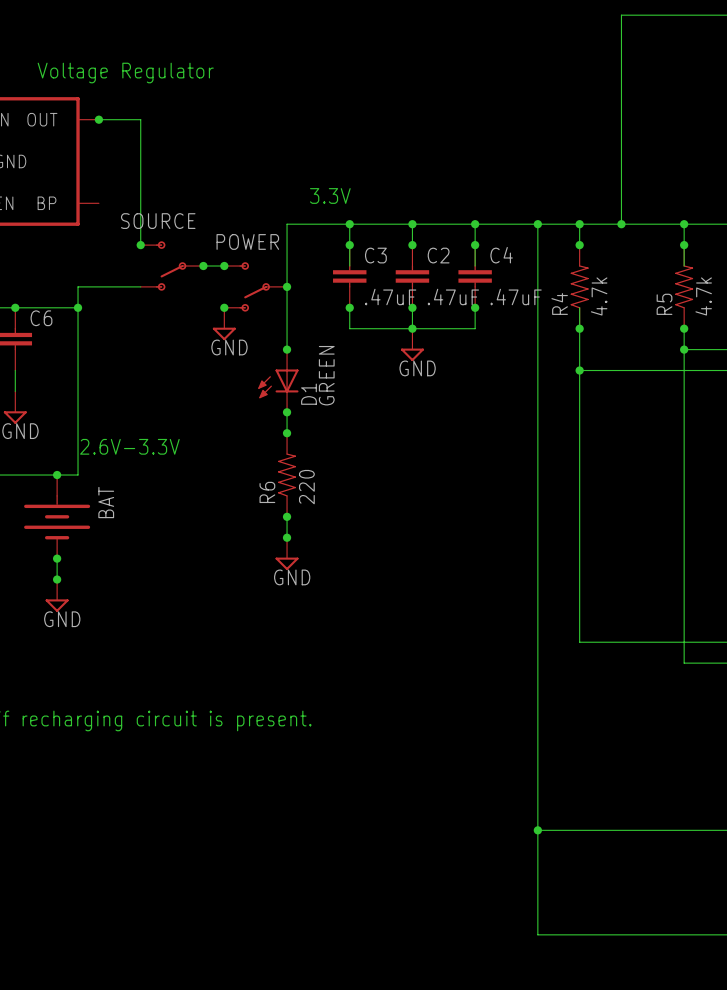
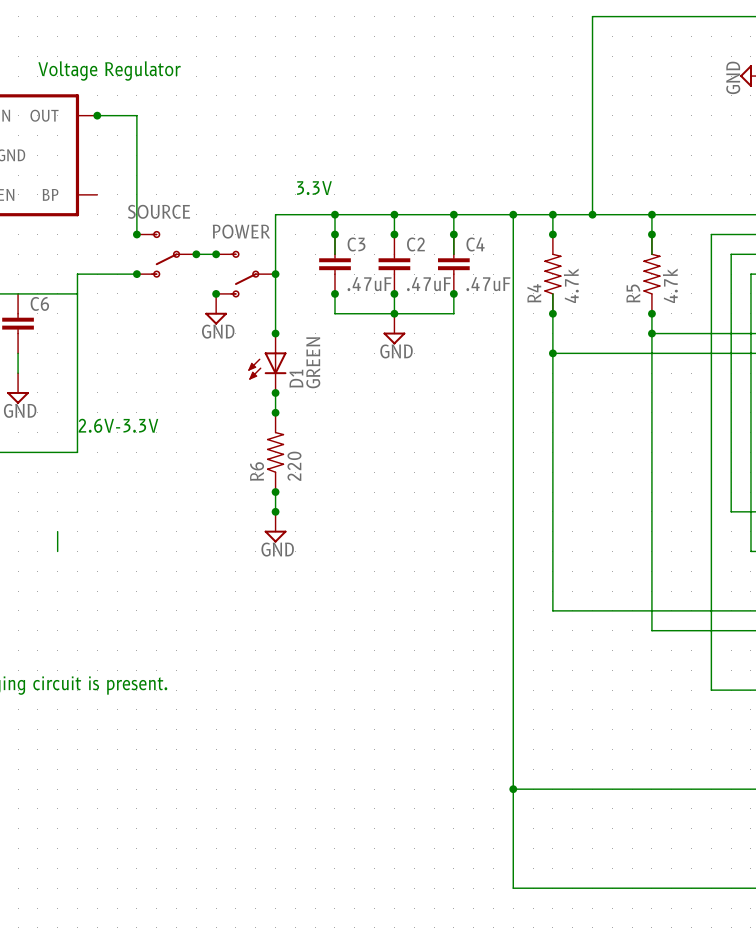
junction: none -> (136, 274)
junction: (15, 307) -> none
junction: (78, 307) -> none
junction: (57, 475) -> none
BAT: (57, 516) -> none
junction: (57, 558) -> none
junction: (57, 579) -> none
power symbol: GND (57, 595) -> none

